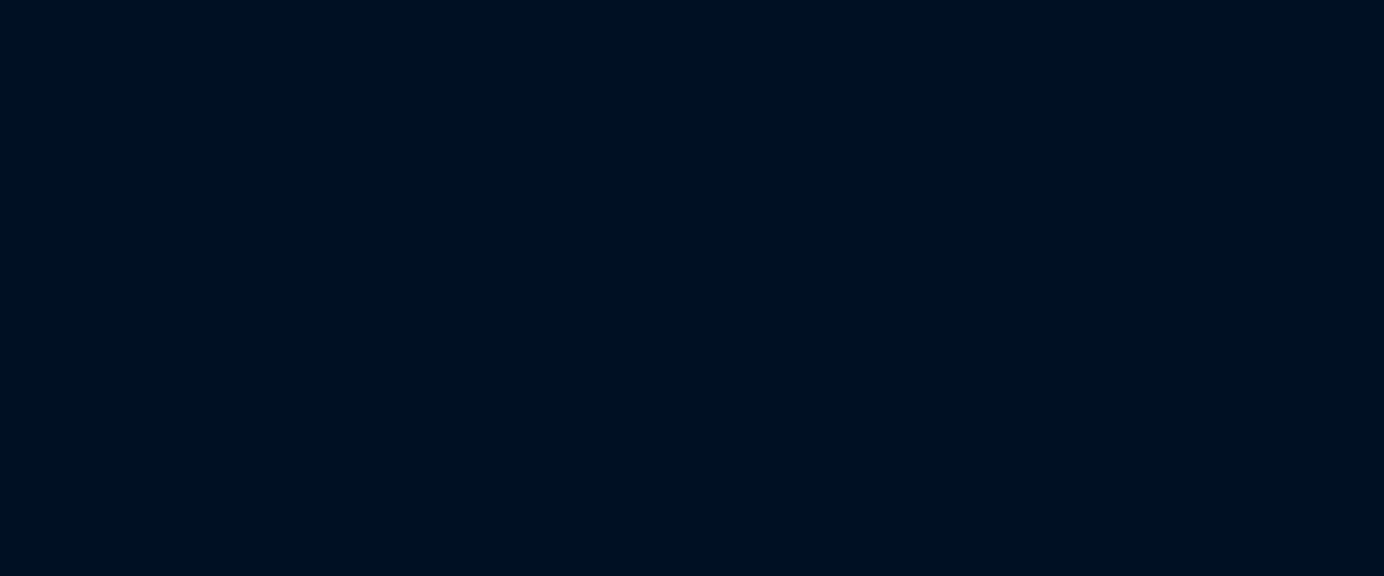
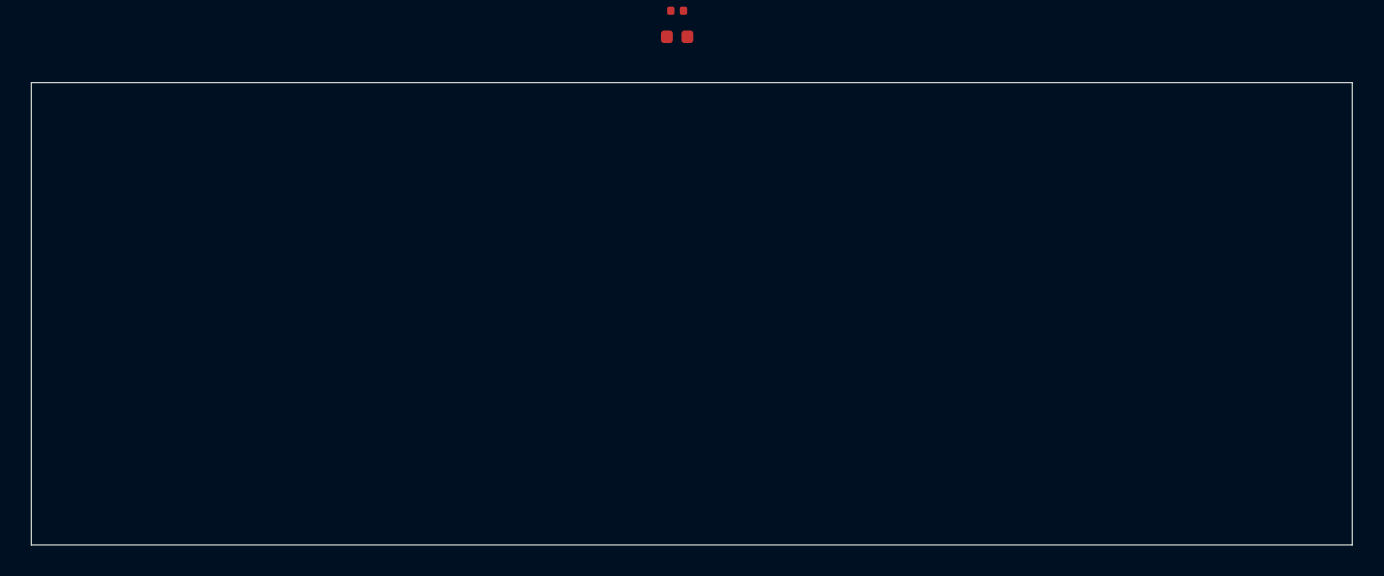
part: none -> (677, 10)
part: none -> (677, 36)
board edge: none -> (1352, 82) (1352, 544) (31, 544) (31, 82) (1352, 82)

